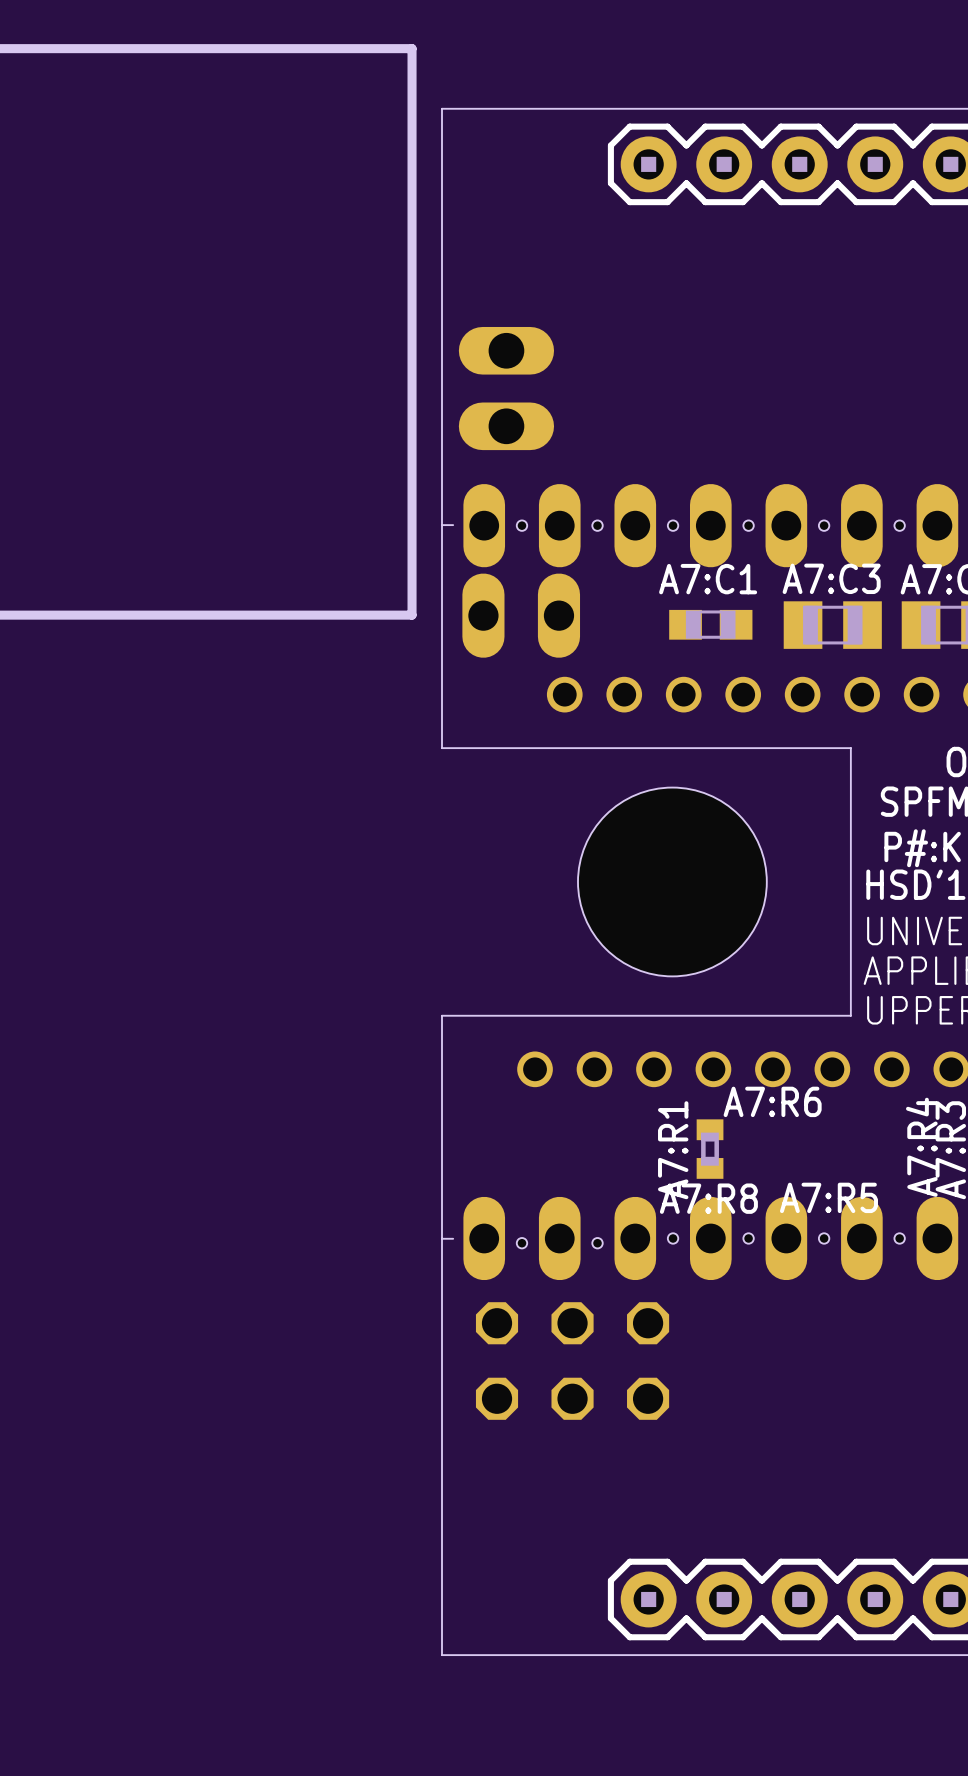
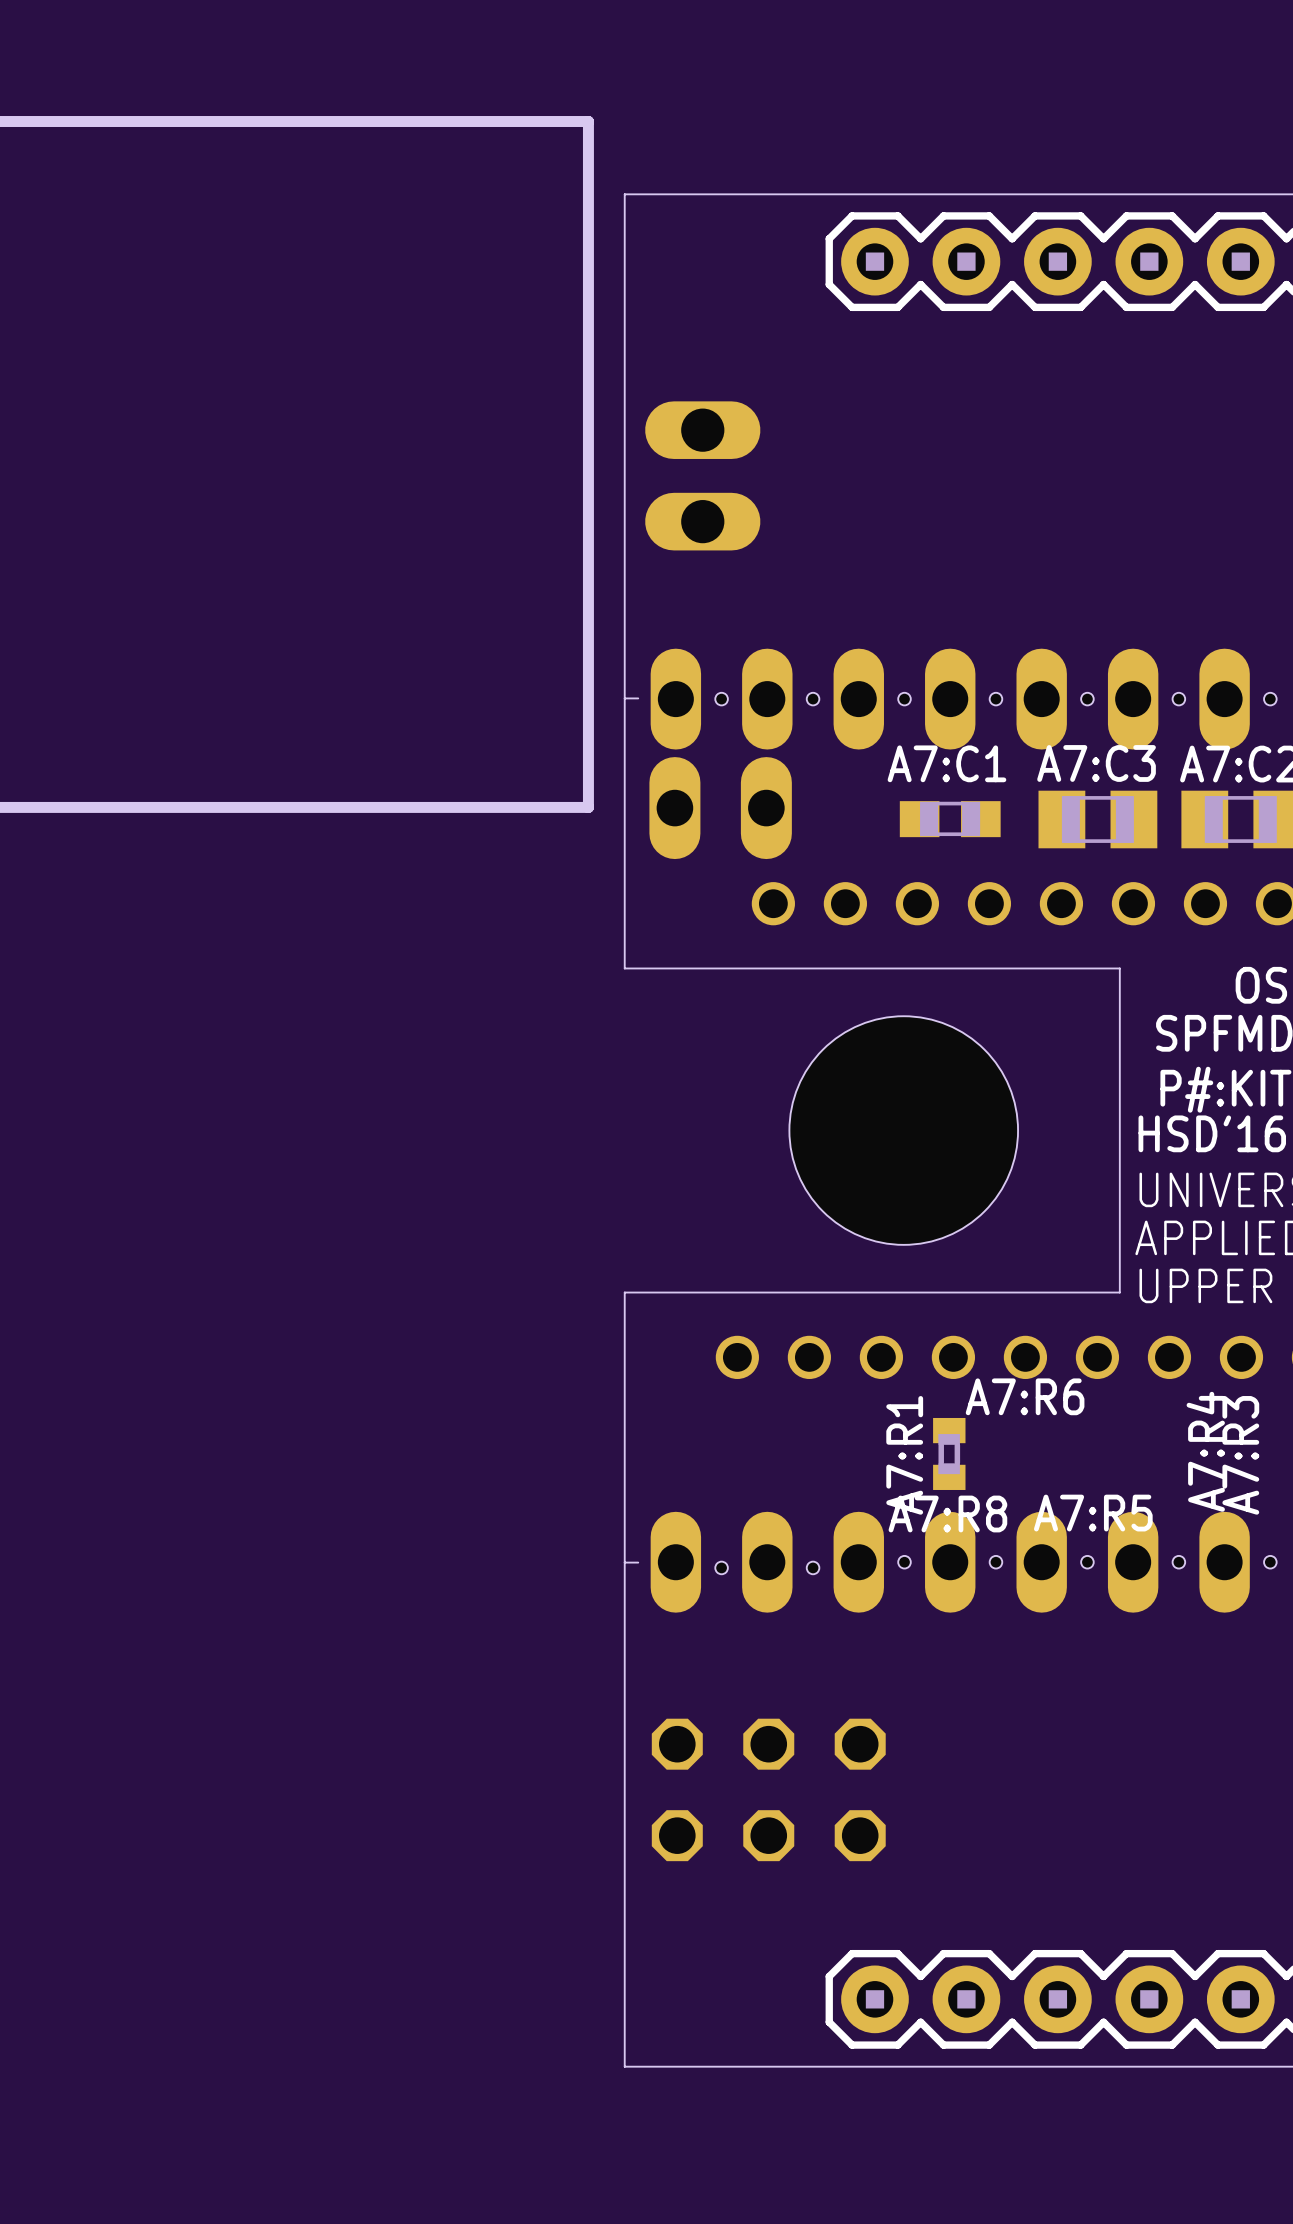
part position: (506, 388) -> (702, 475)
part position: (572, 1361) -> (768, 1789)

